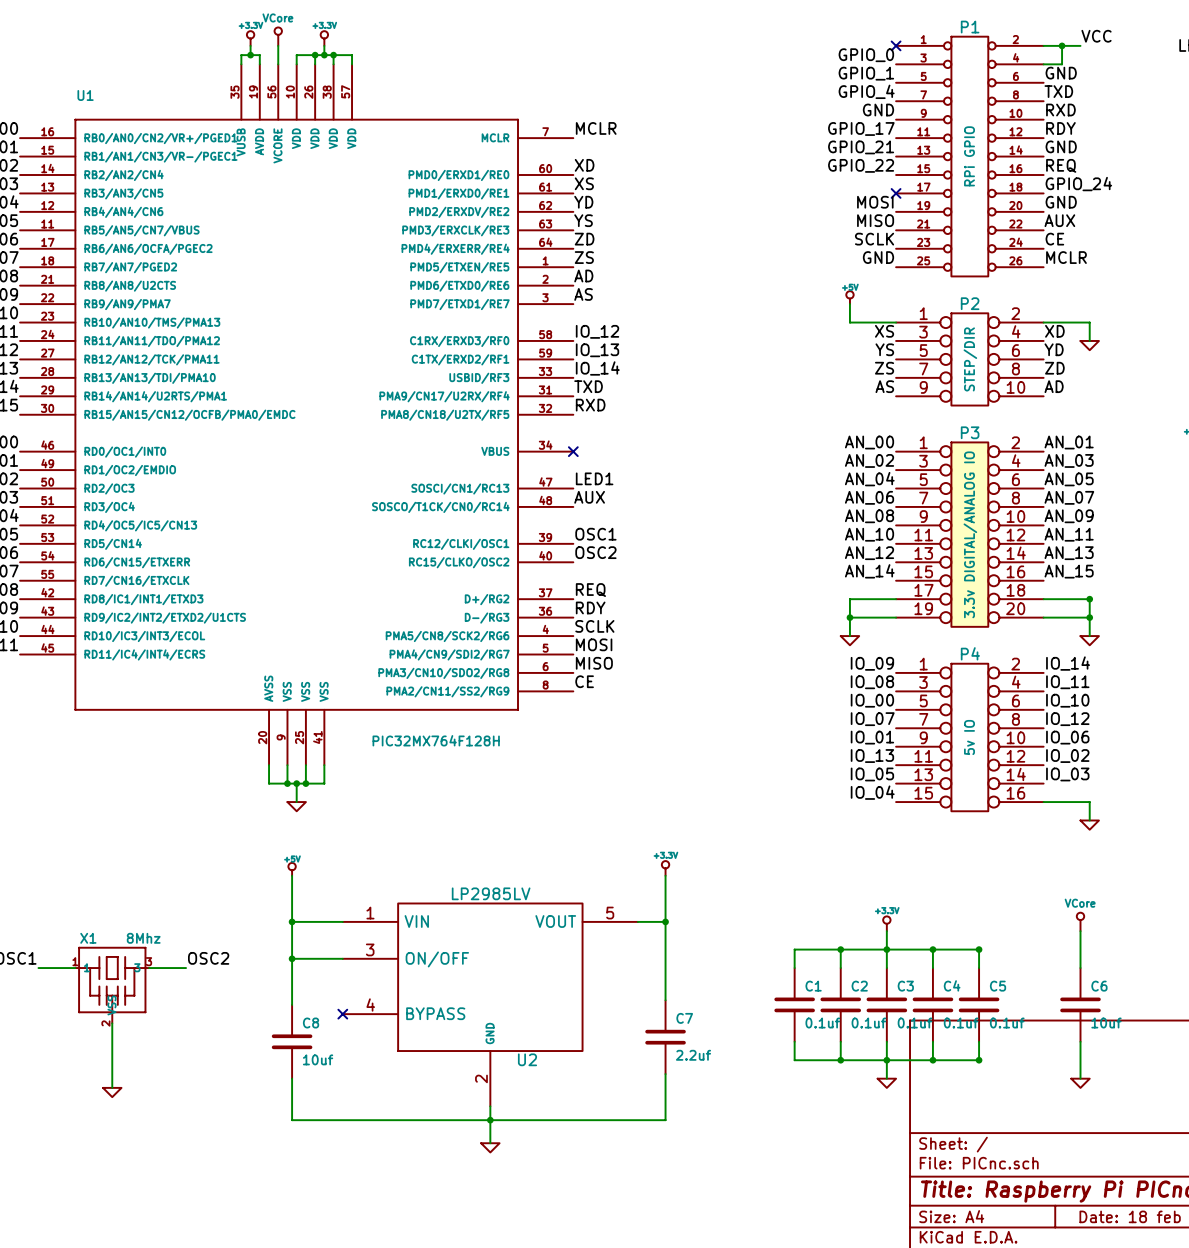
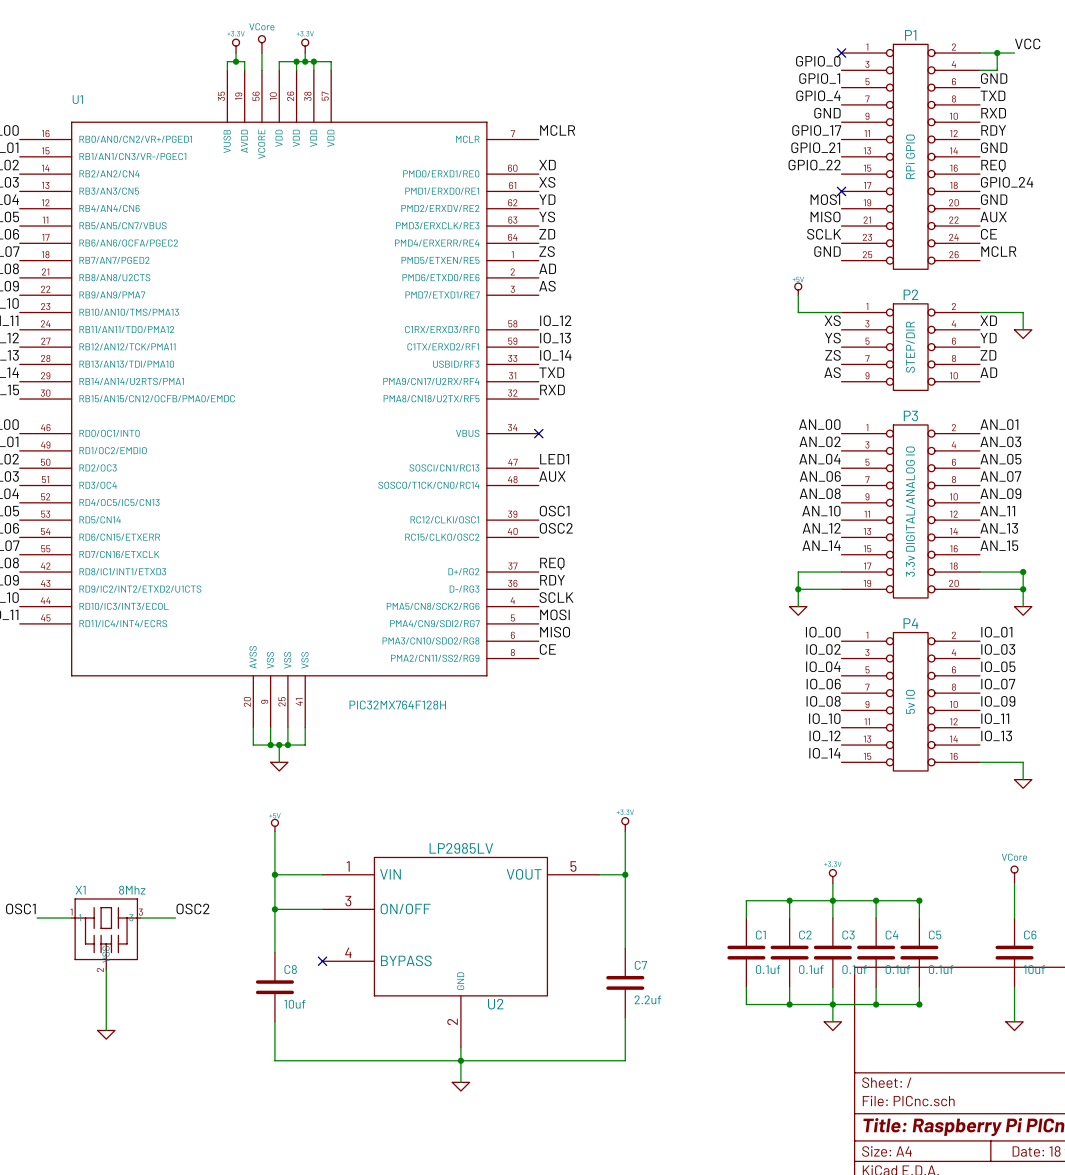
P2 symbol: [896, 313, 1044, 406] -> [841, 303, 980, 391]
P3 symbol: [896, 442, 1044, 627] -> [841, 424, 980, 598]
label: IO_09 (872, 663) -> IO_00 (823, 632)
P4 symbol: [896, 663, 1044, 812] -> [841, 632, 980, 771]
label: IO_14 (1068, 663) -> IO_01 (996, 632)
label: IO_08 (872, 682) -> IO_02 (823, 649)
label: IO_11 (1067, 682) -> IO_03 (998, 649)
label: IO_00 (872, 700) -> IO_04 (823, 666)
label: IO_10 (1067, 700) -> IO_05 (998, 666)
label: IO_07 (872, 719) -> IO_06 (823, 684)
label: IO_12 (1067, 719) -> IO_07 (998, 684)
label: IO_01 (872, 737) -> IO_08 (823, 701)
label: IO_06 (1067, 737) -> IO_09 (998, 701)
label: IO_13 (872, 756) -> IO_10 (824, 718)
label: IO_02 (1067, 756) -> IO_11 (995, 718)
label: IO_05 (872, 774) -> IO_12 (825, 735)
label: IO_03 (1067, 774) -> IO_13 (996, 735)
label: IO_04 (872, 792) -> IO_14 (824, 753)

